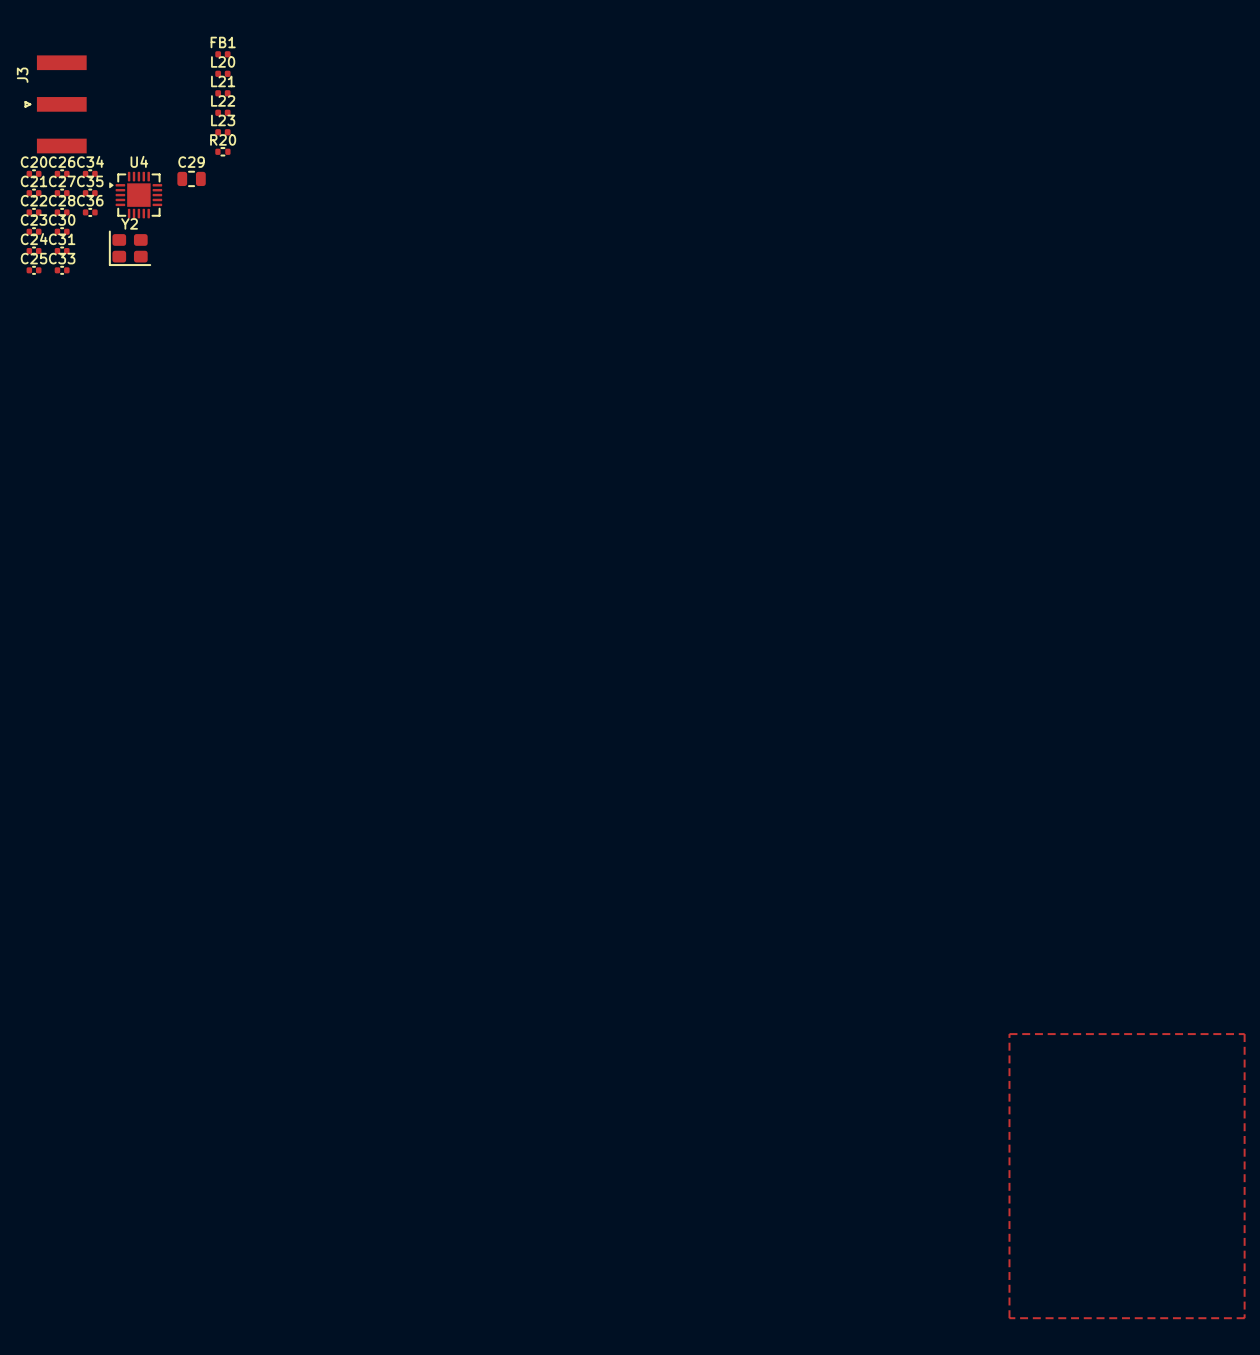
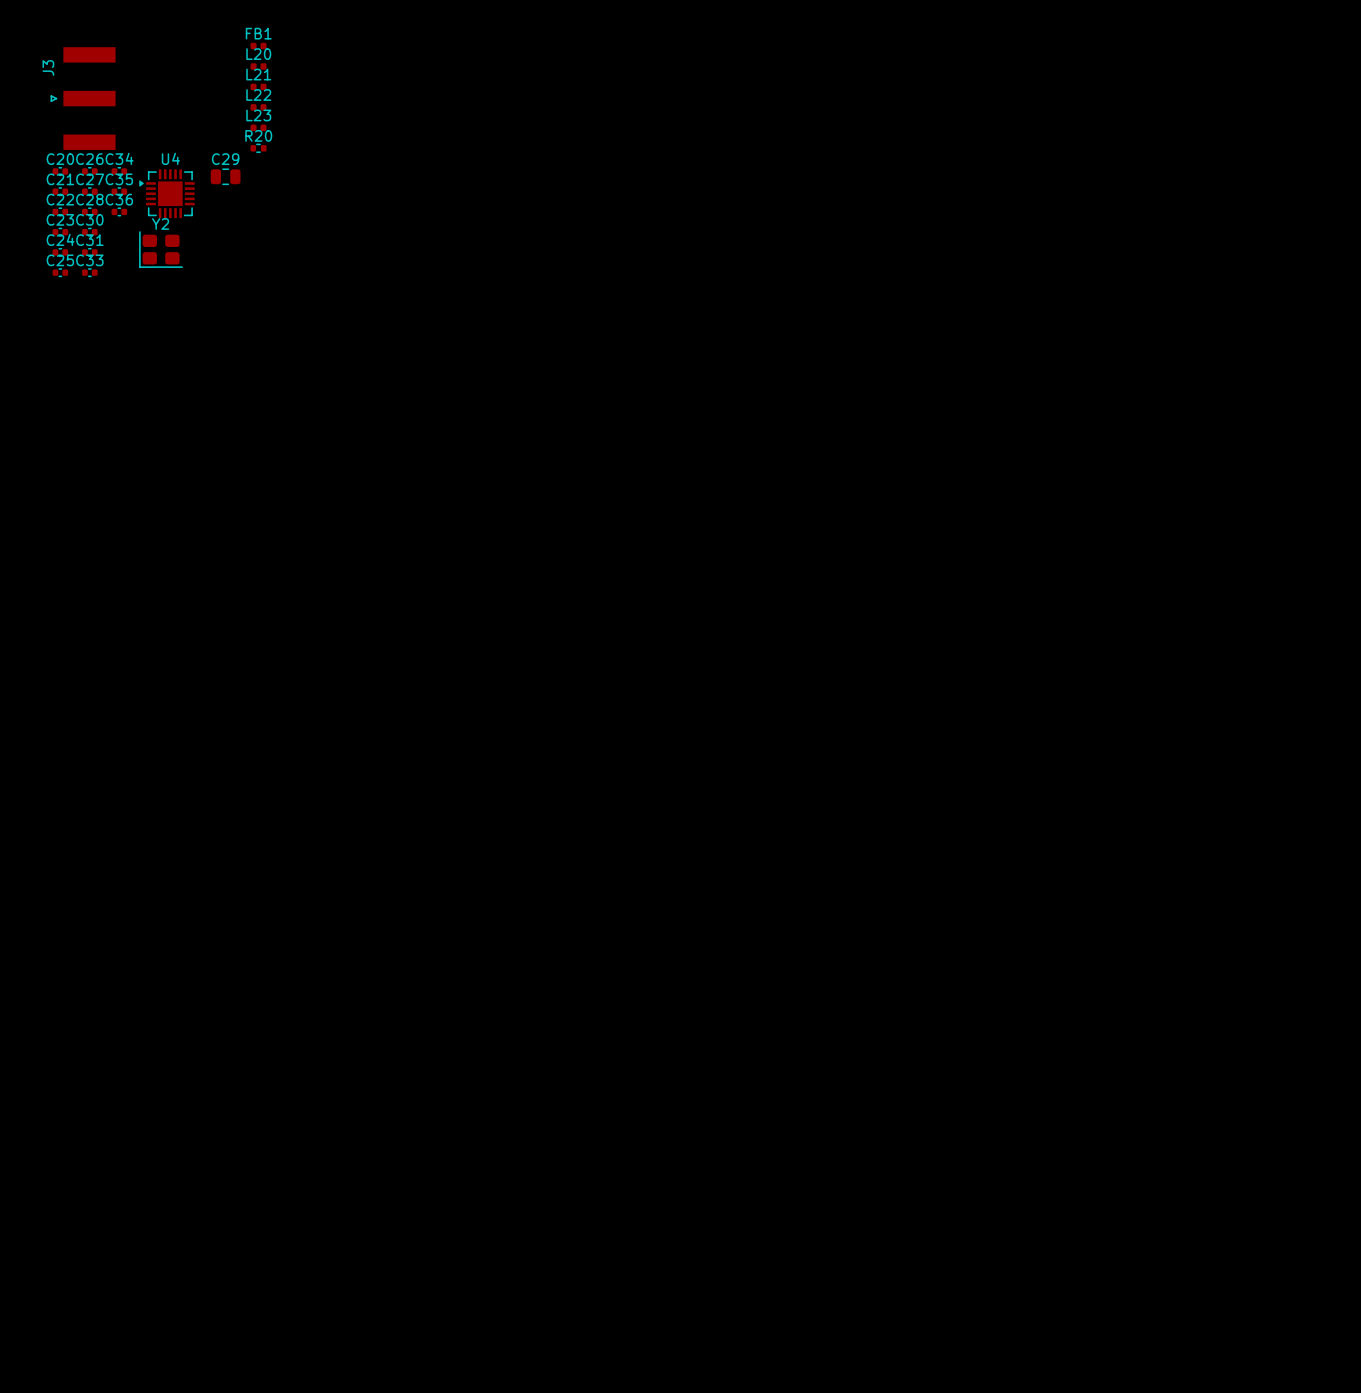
zone outline: (1009, 1034) (1244, 1034) (1244, 1318) (1009, 1318) (1009, 1034) -> none

